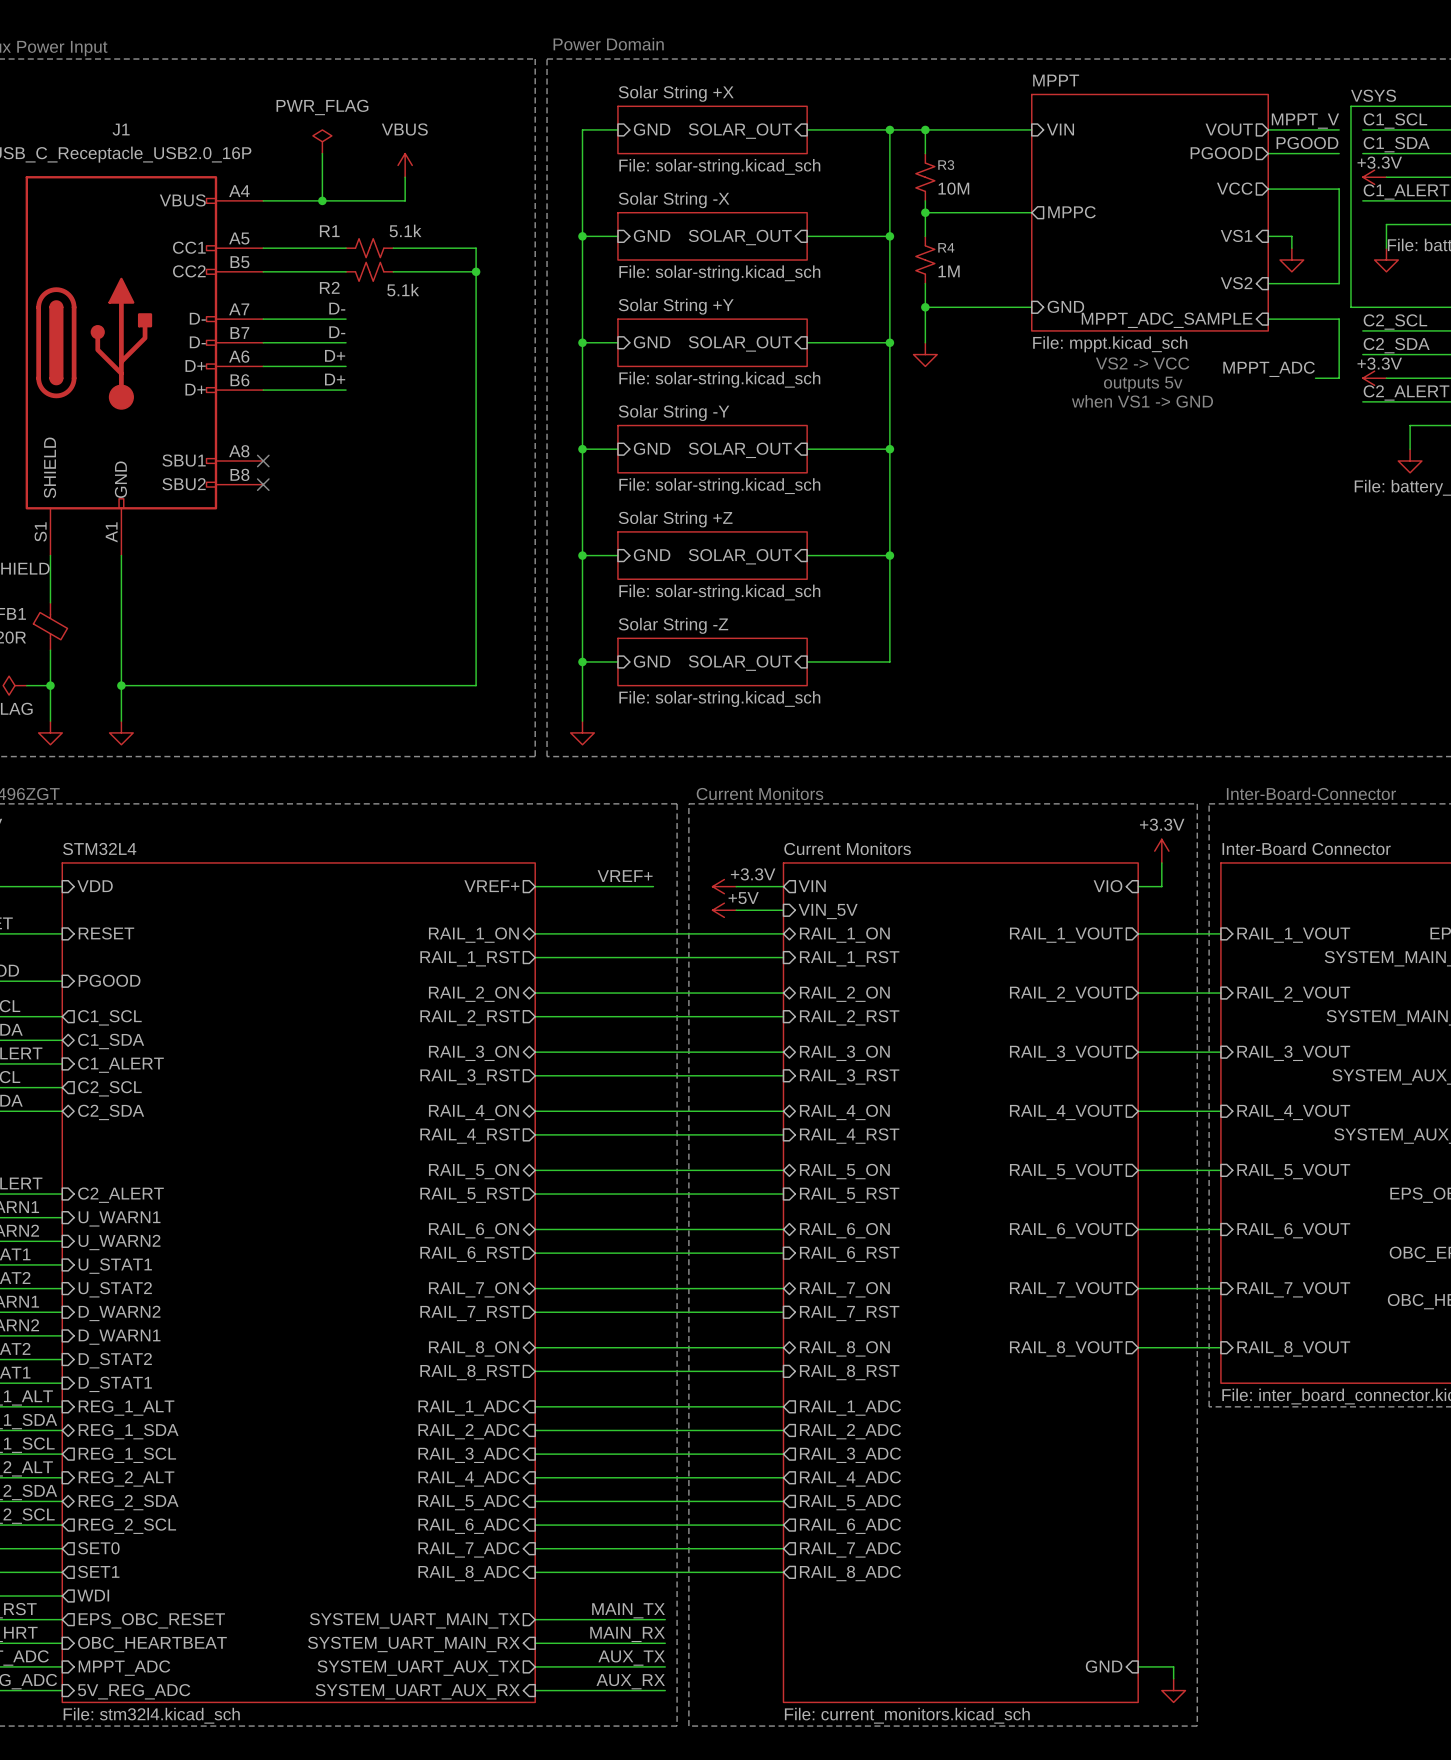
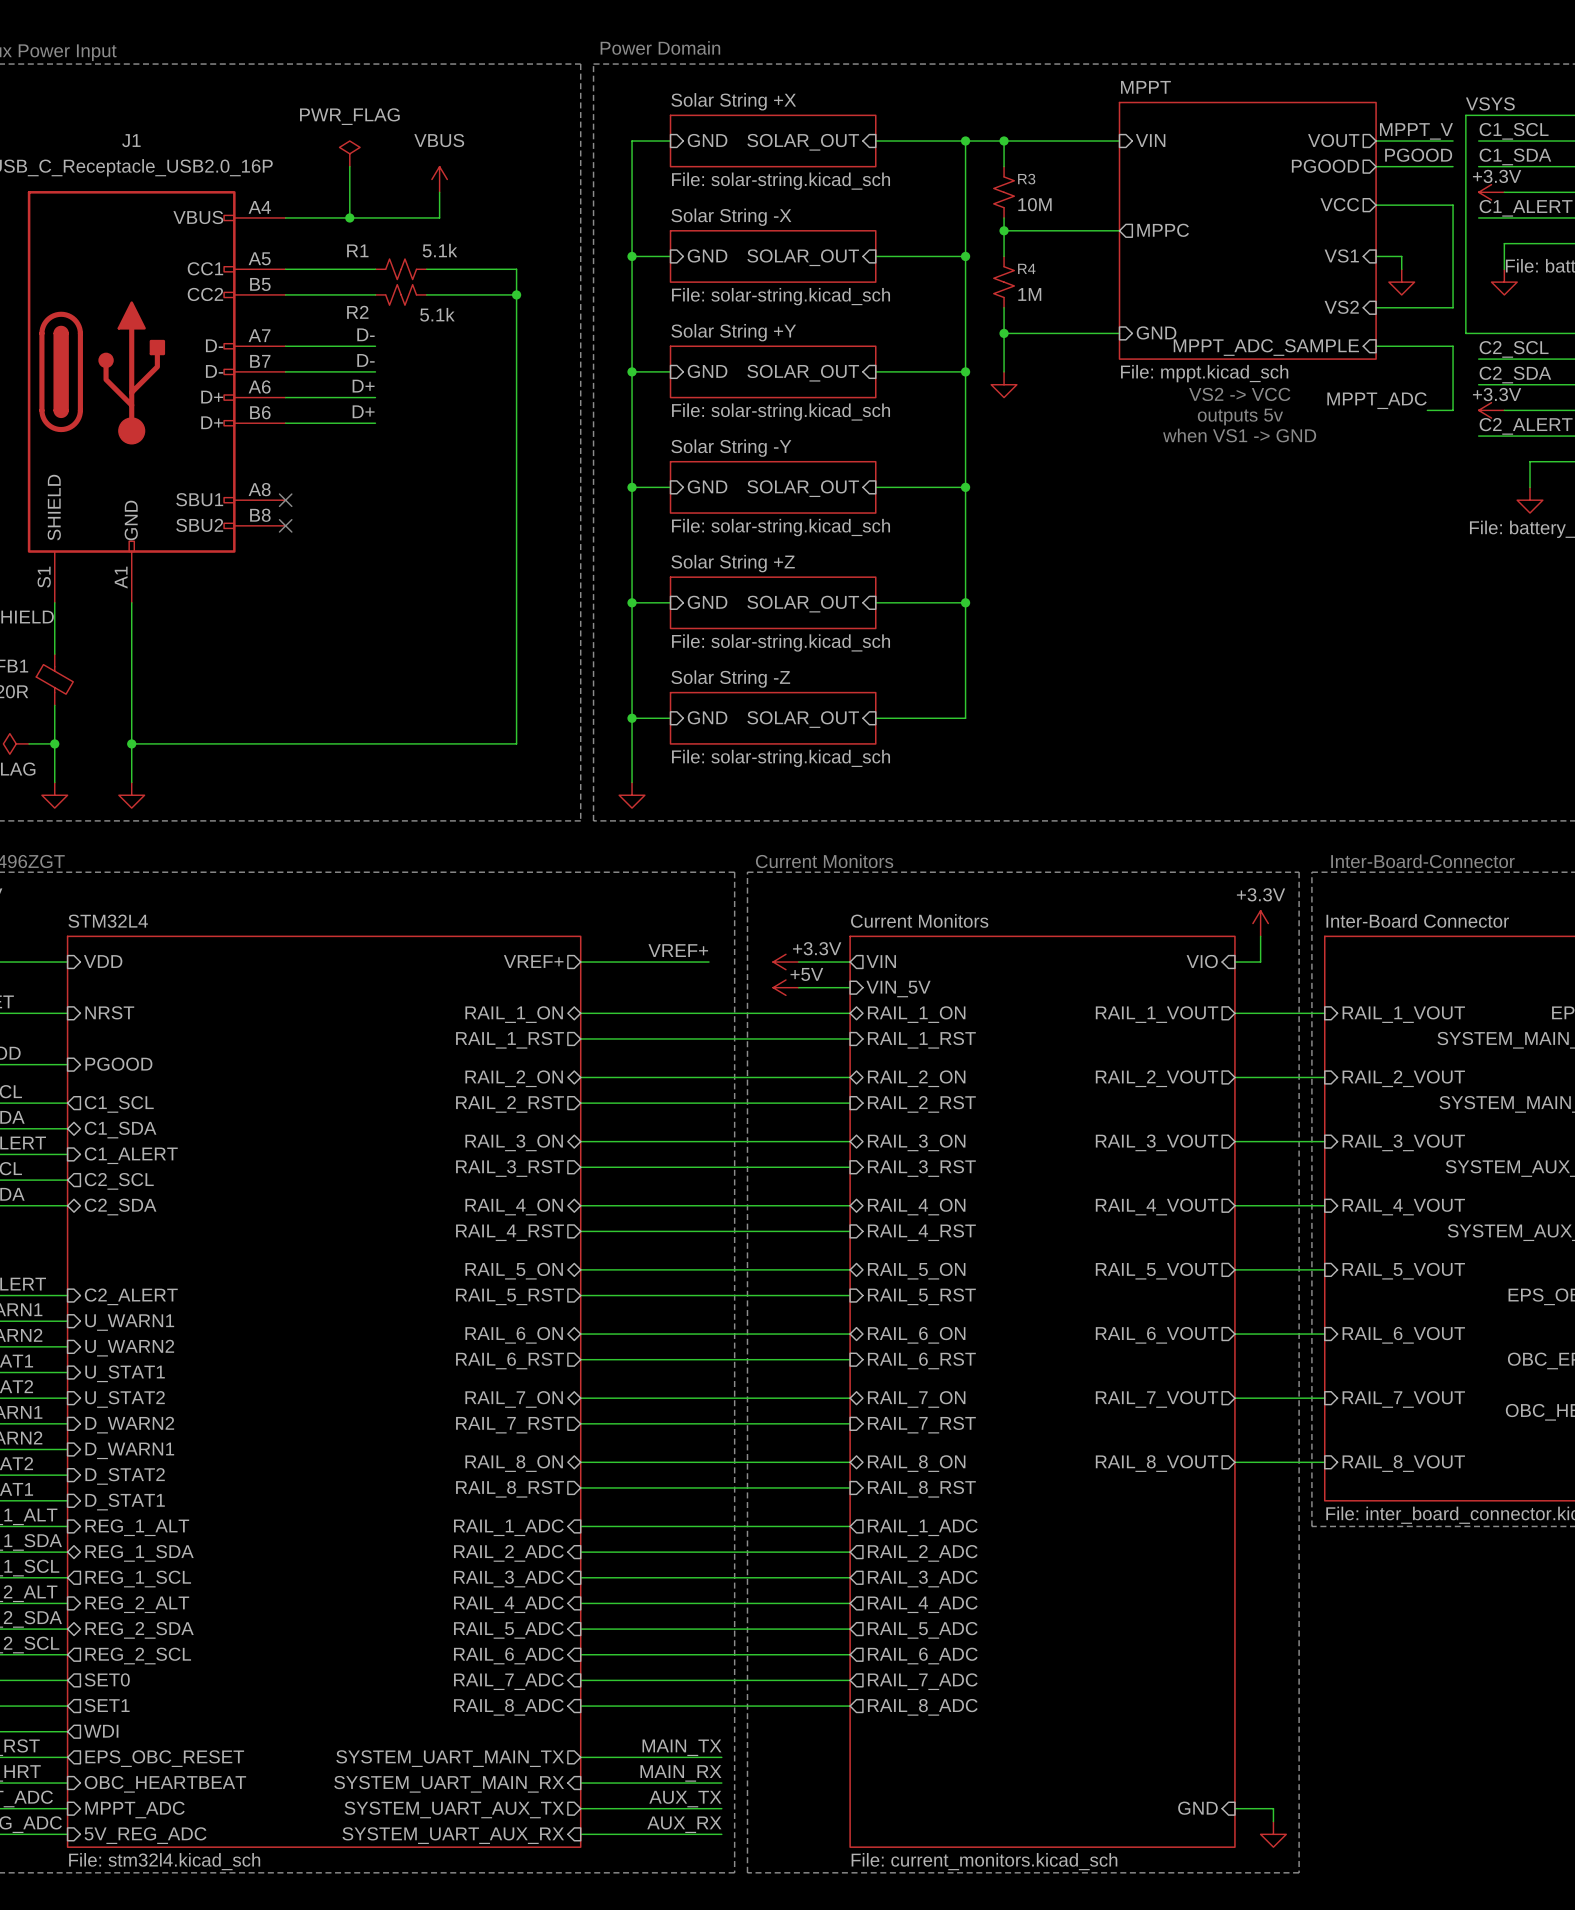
sheet pin: RESET (106, 933) -> NRST (109, 1012)

